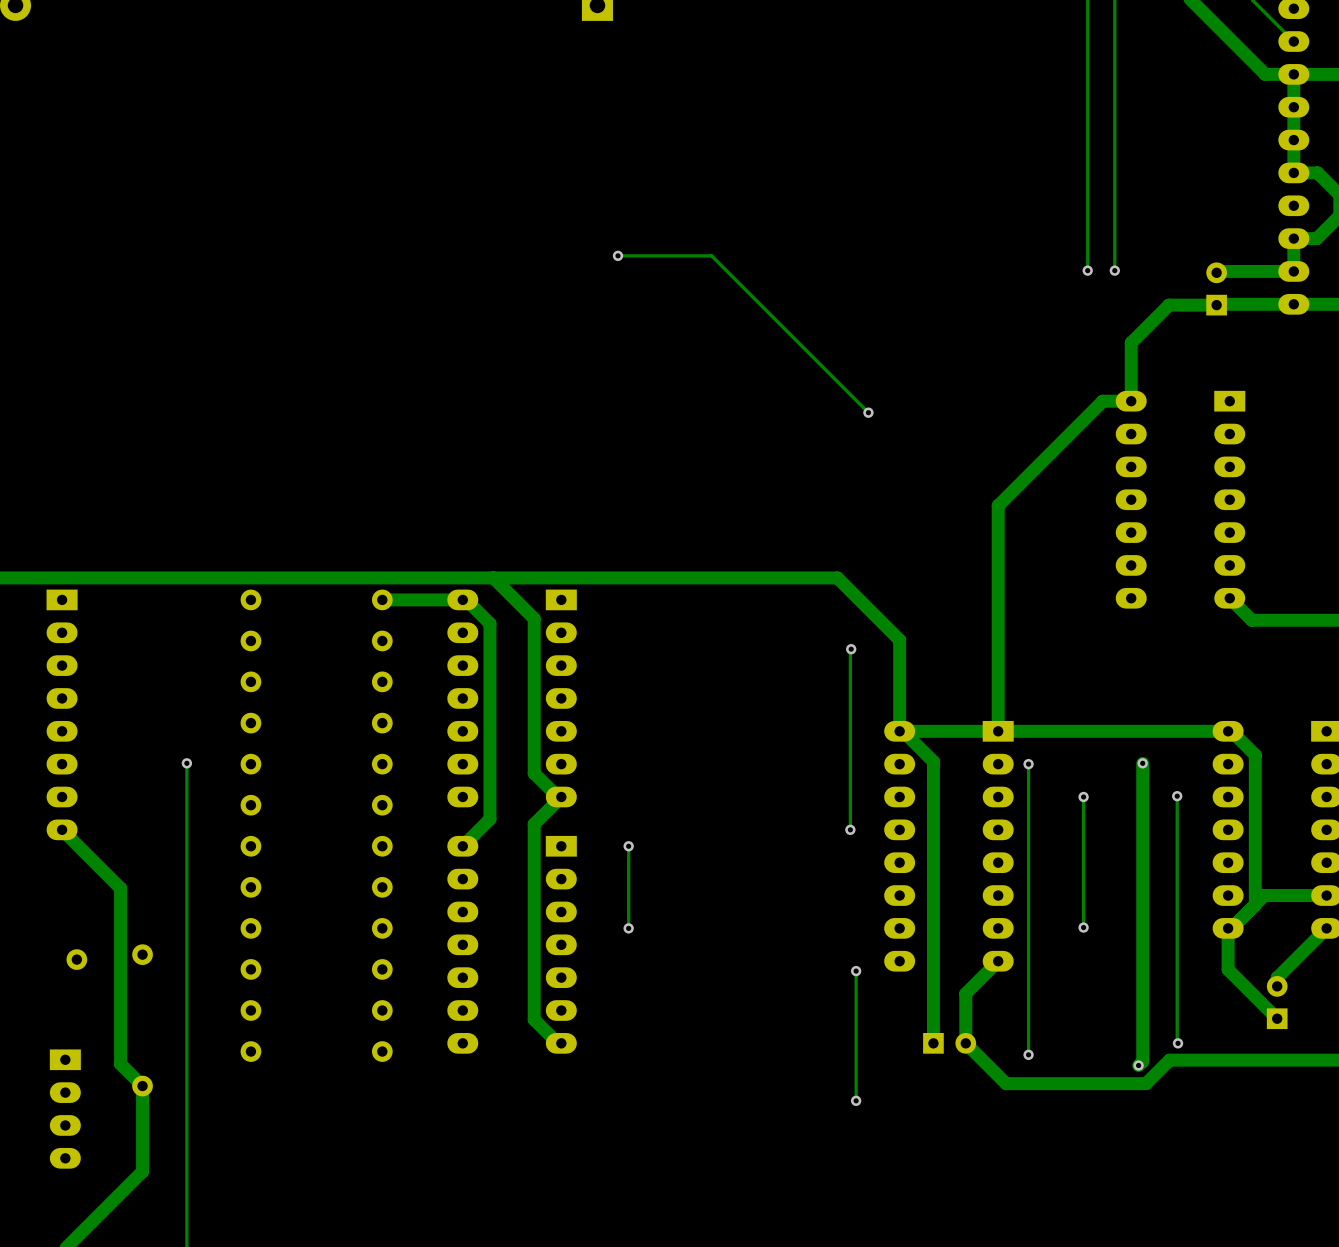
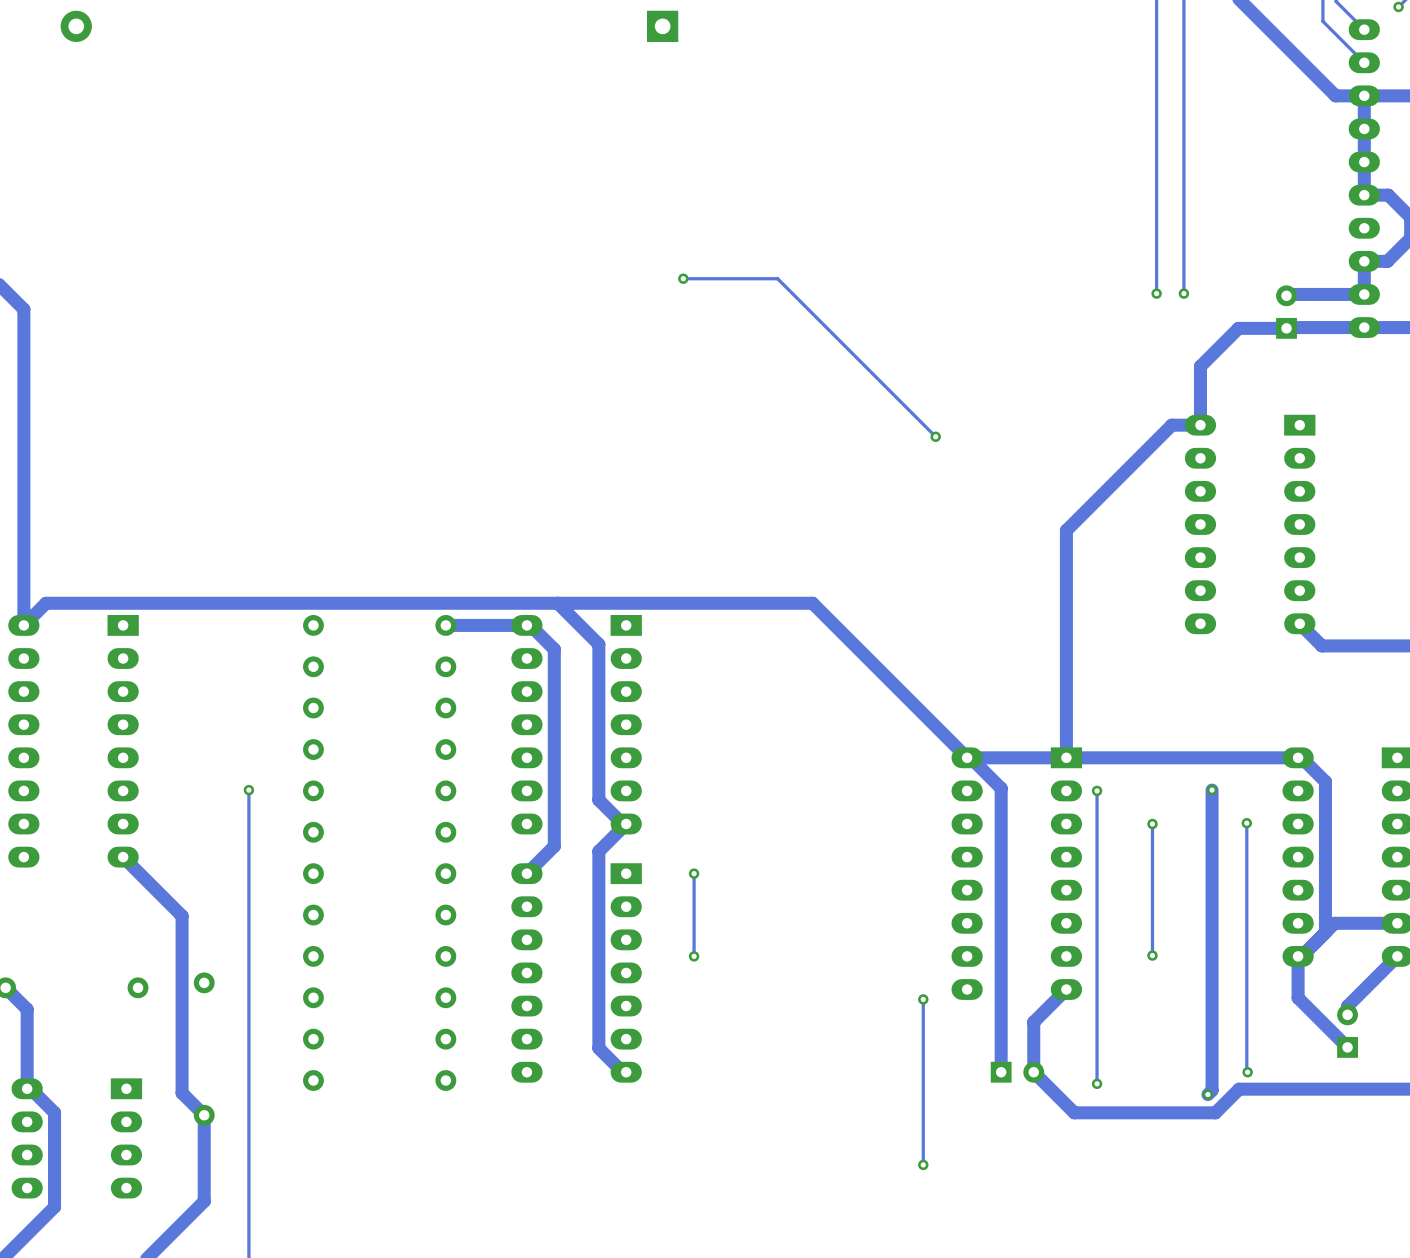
track: (746, 577) (837, 577) (899, 640) (899, 731) -> (812, 603) (967, 757)
track: (851, 649) (850, 829) -> none
via: (851, 649) -> none
via: (850, 829) -> none
track: none -> (923, 1130) (923, 1164)
via position: (856, 1100) -> (923, 1164)

